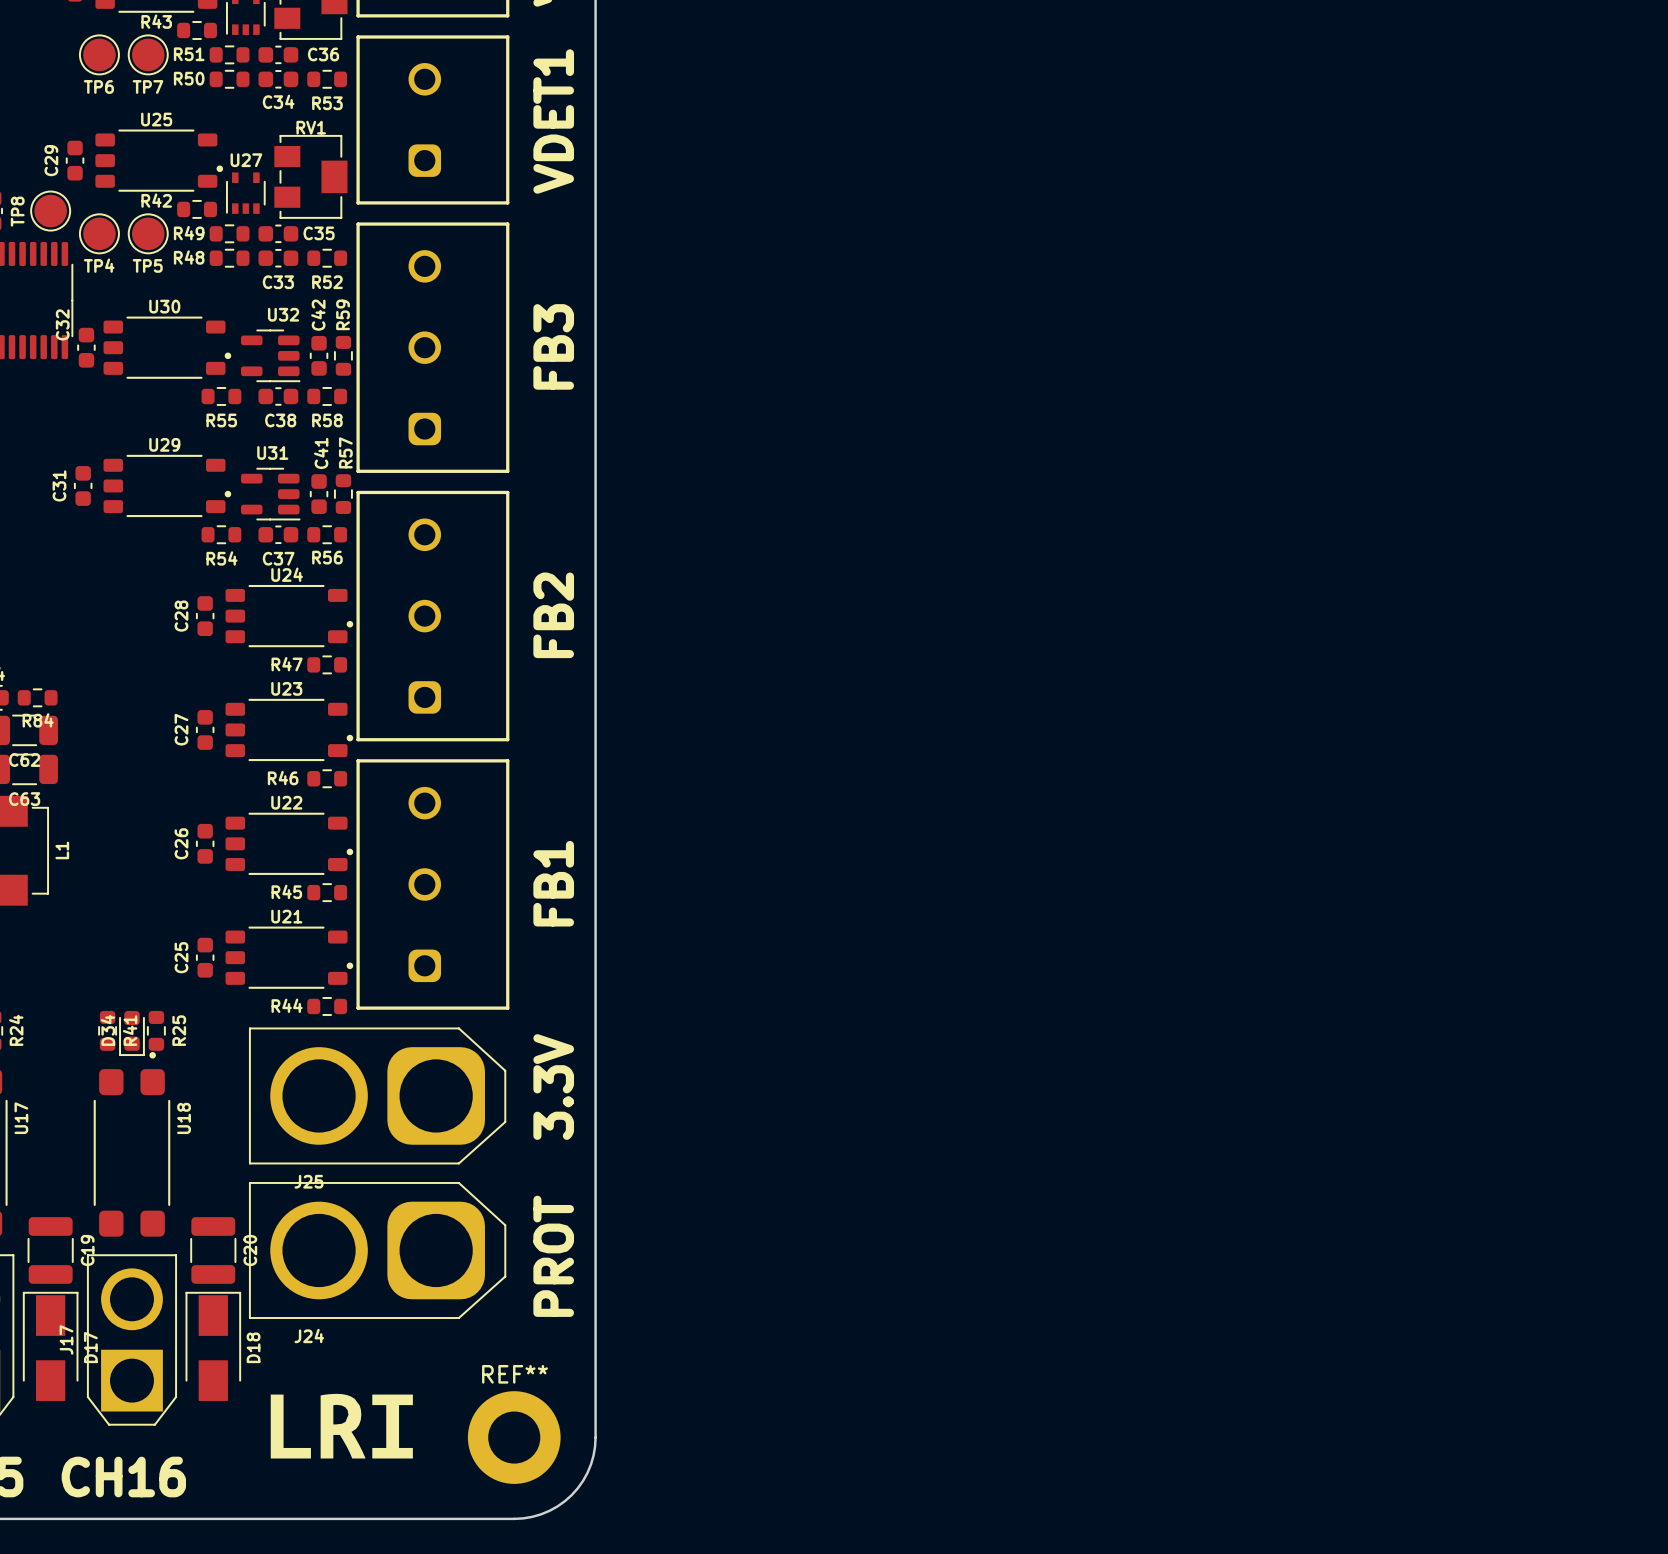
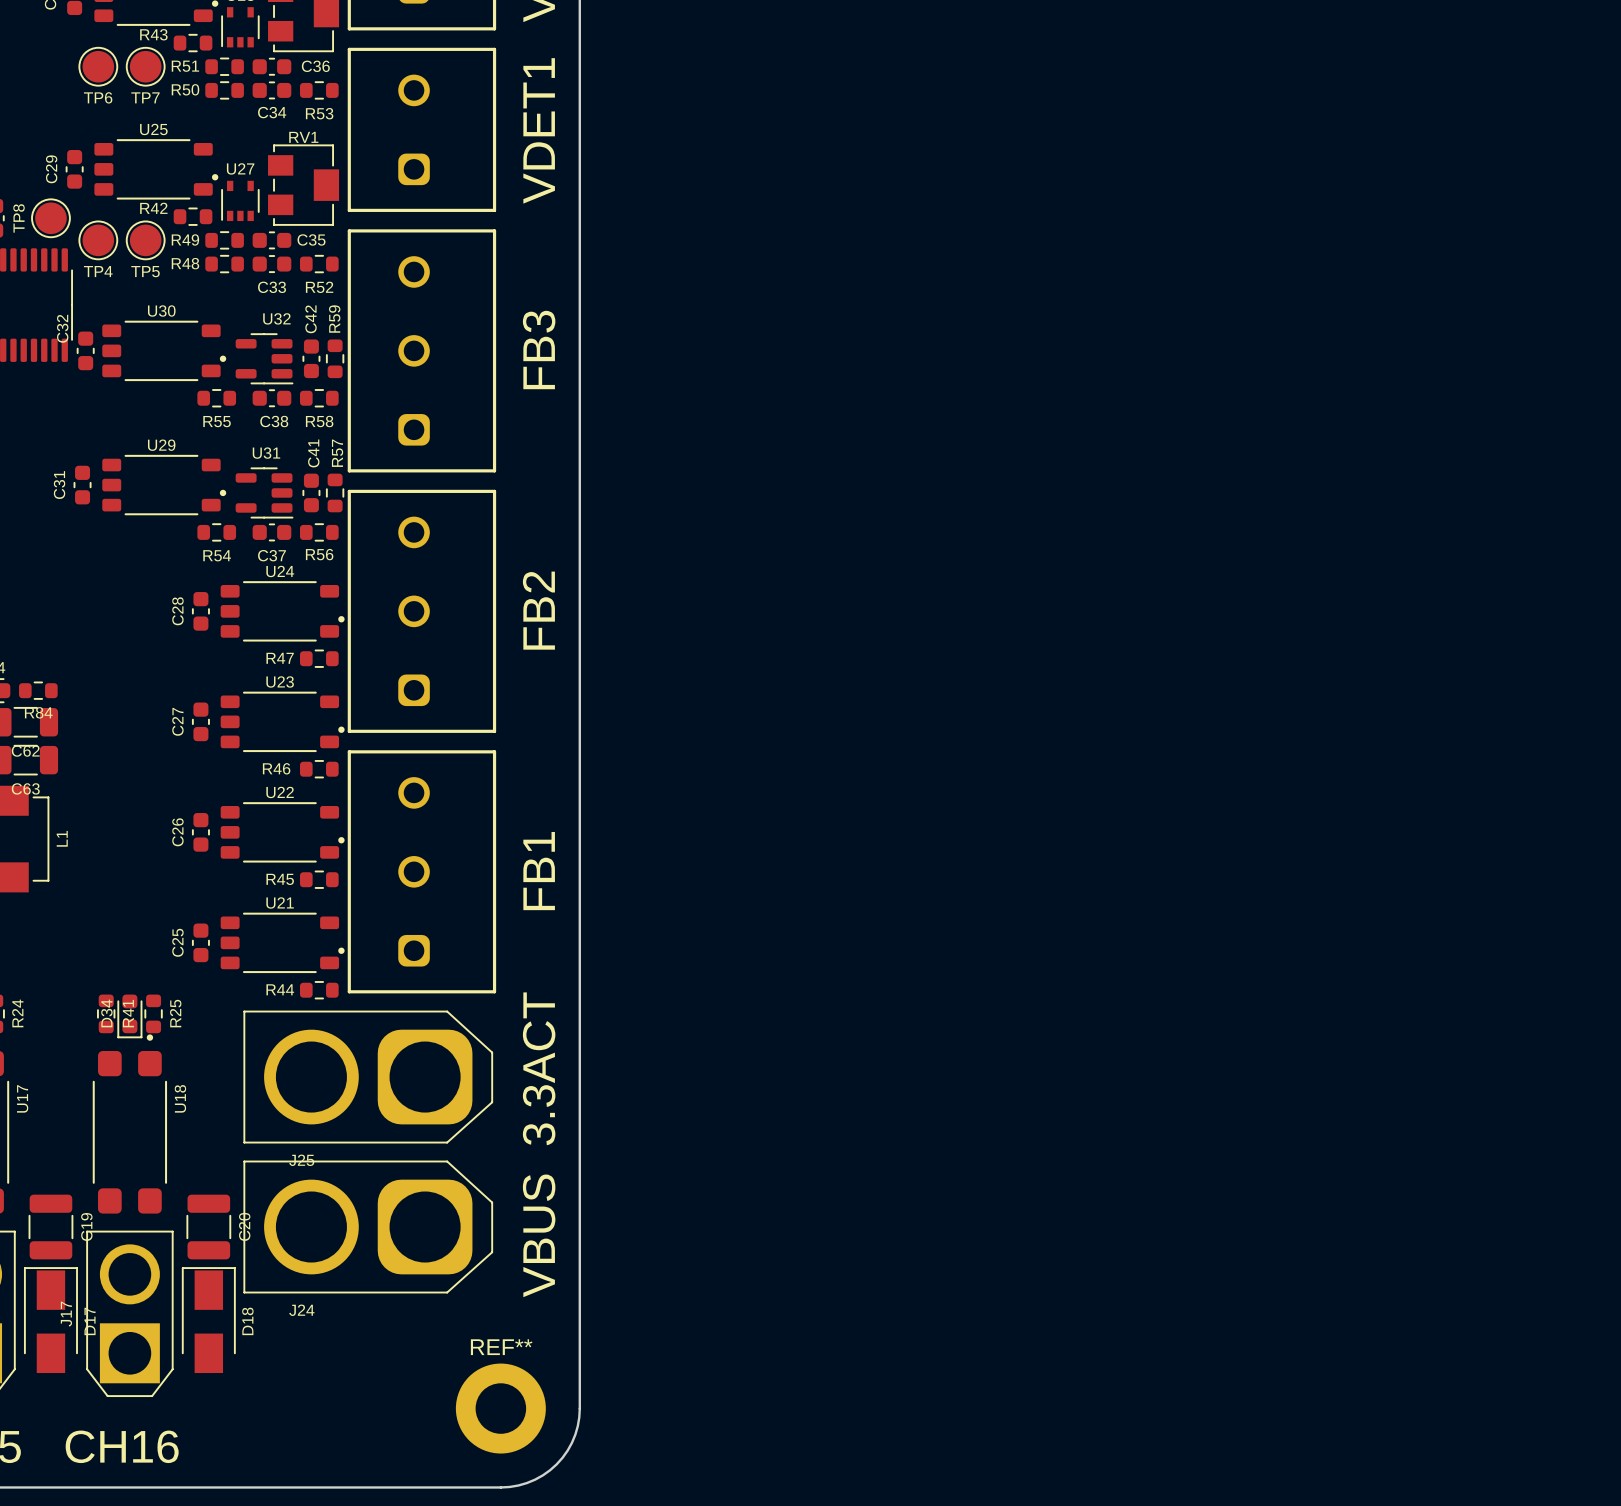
text: 3.3V (553, 1087) -> 3.3ACT (539, 1068)
text: PROT (553, 1256) -> VBUS (539, 1235)
drawing: [270, 1393, 413, 1459] -> none

